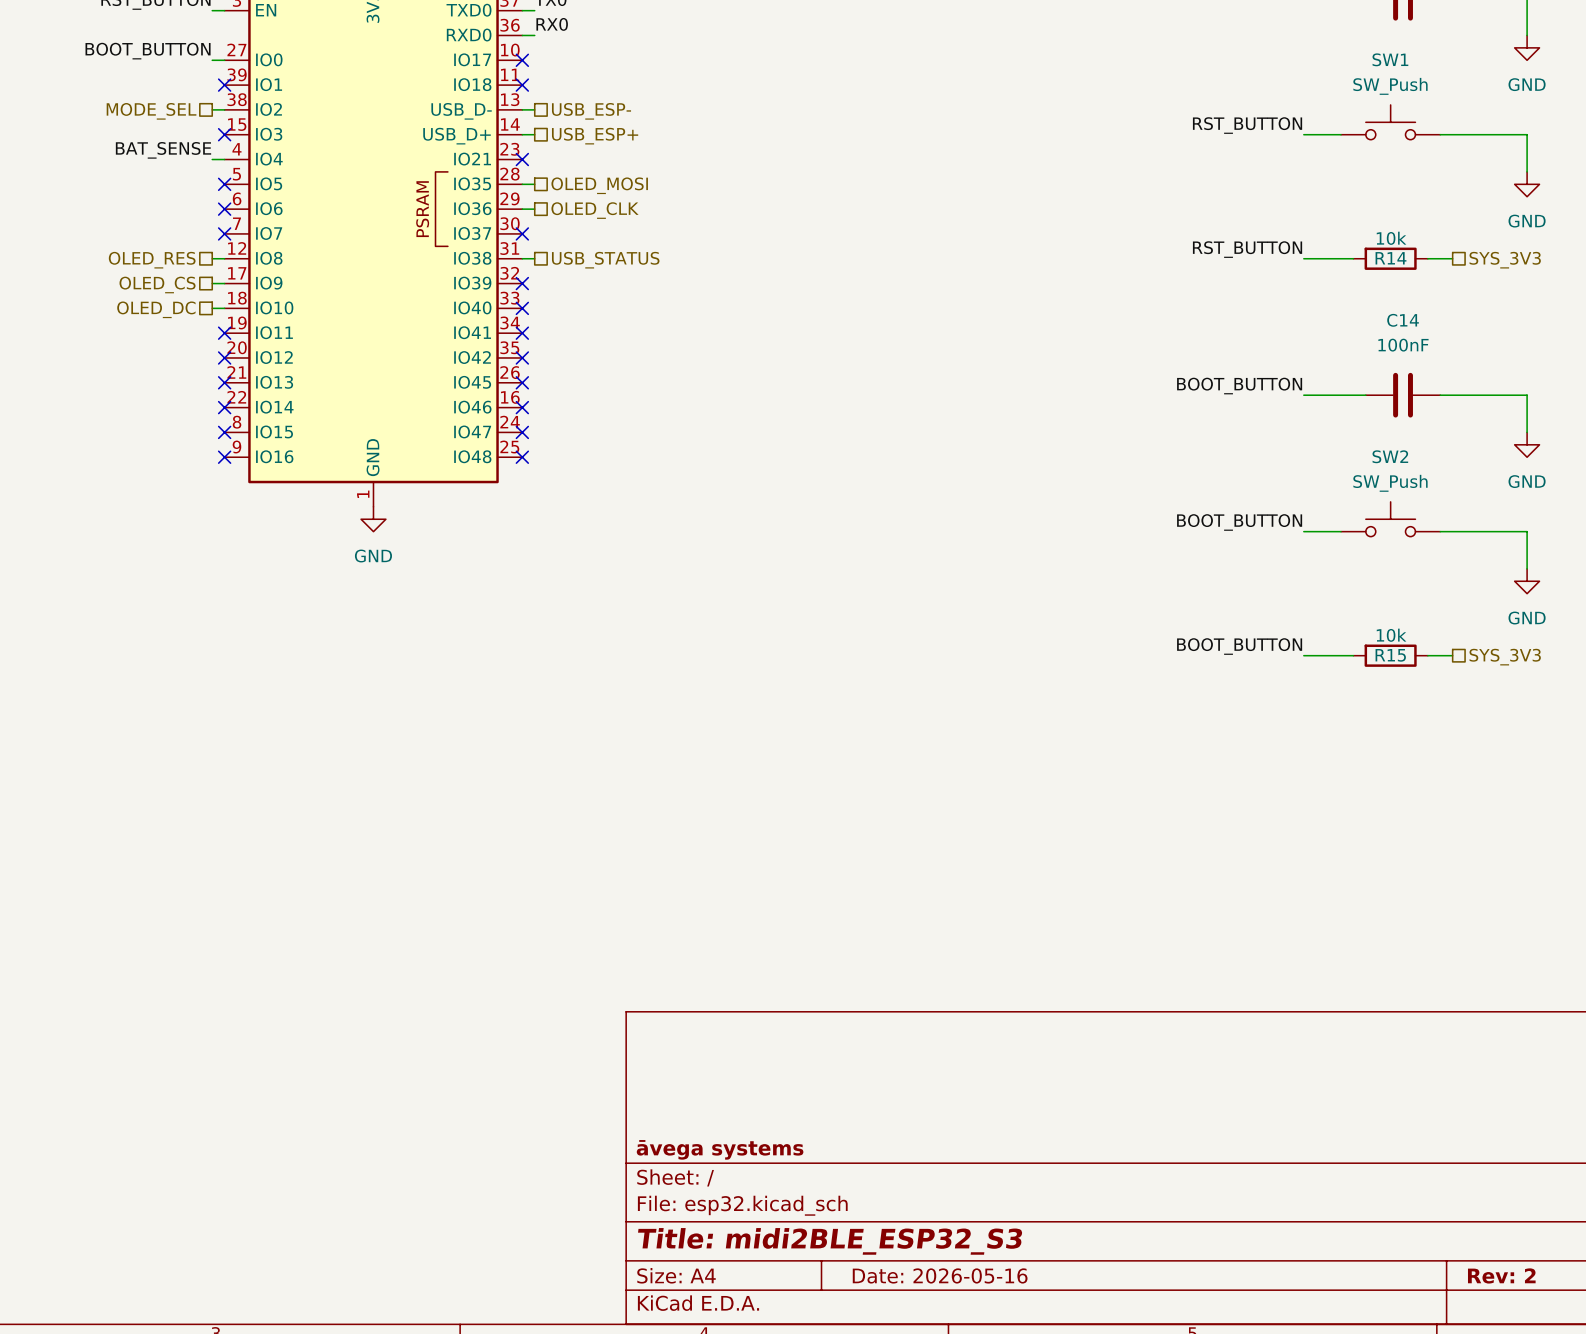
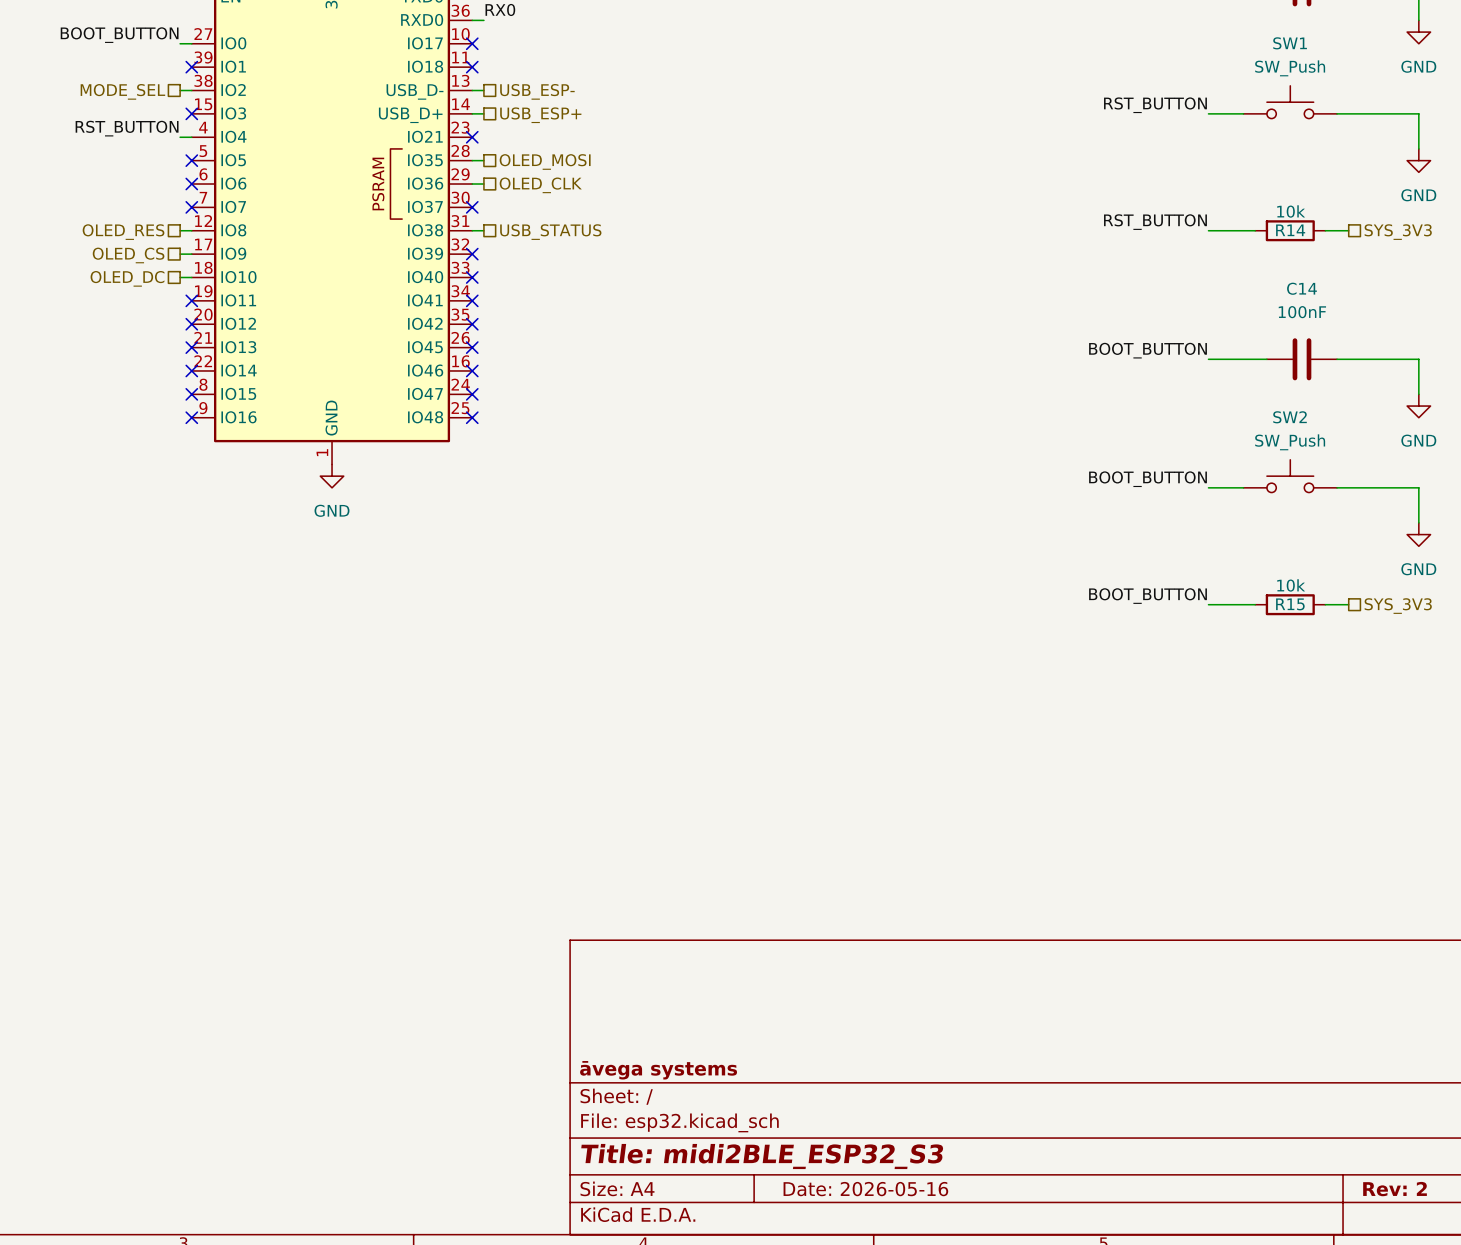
label: BAT_SENSE (163, 150) -> RST_BUTTON (127, 128)

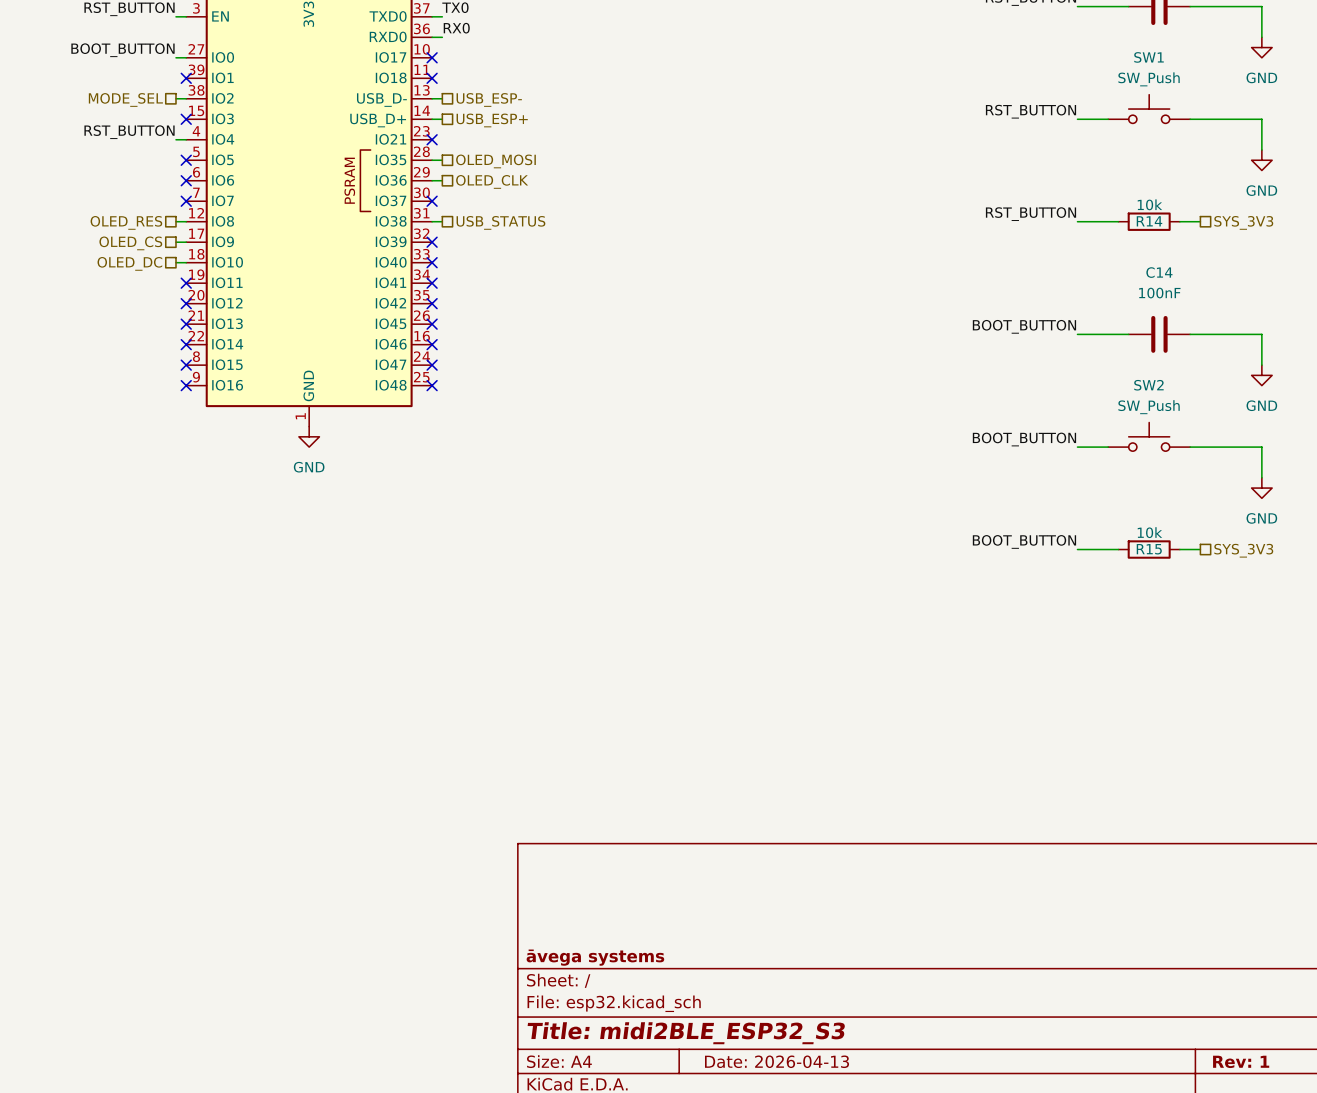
title block: Date: 2026-05-16 (865, 1189) -> Date: 2026-04-13 (777, 1061)
title block: Rev: 2 (1395, 1189) -> Rev: 1 (1241, 1061)

